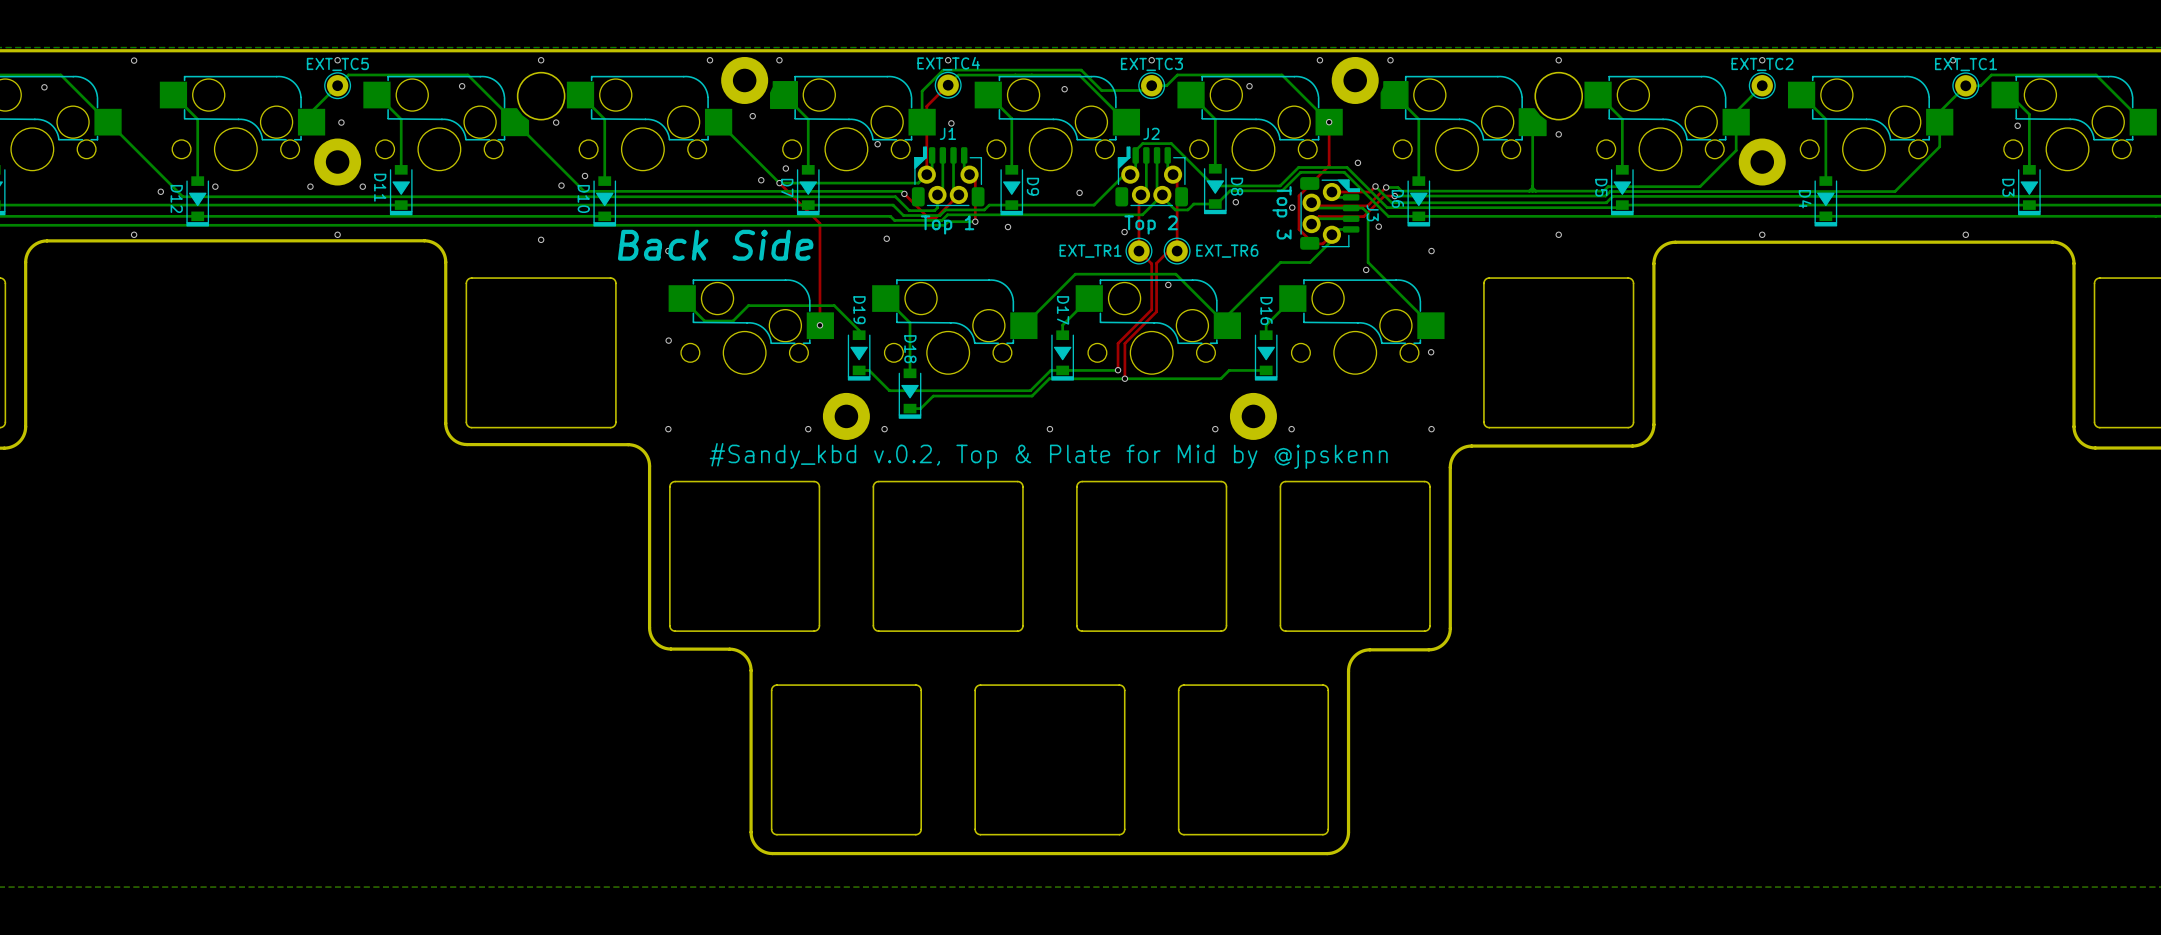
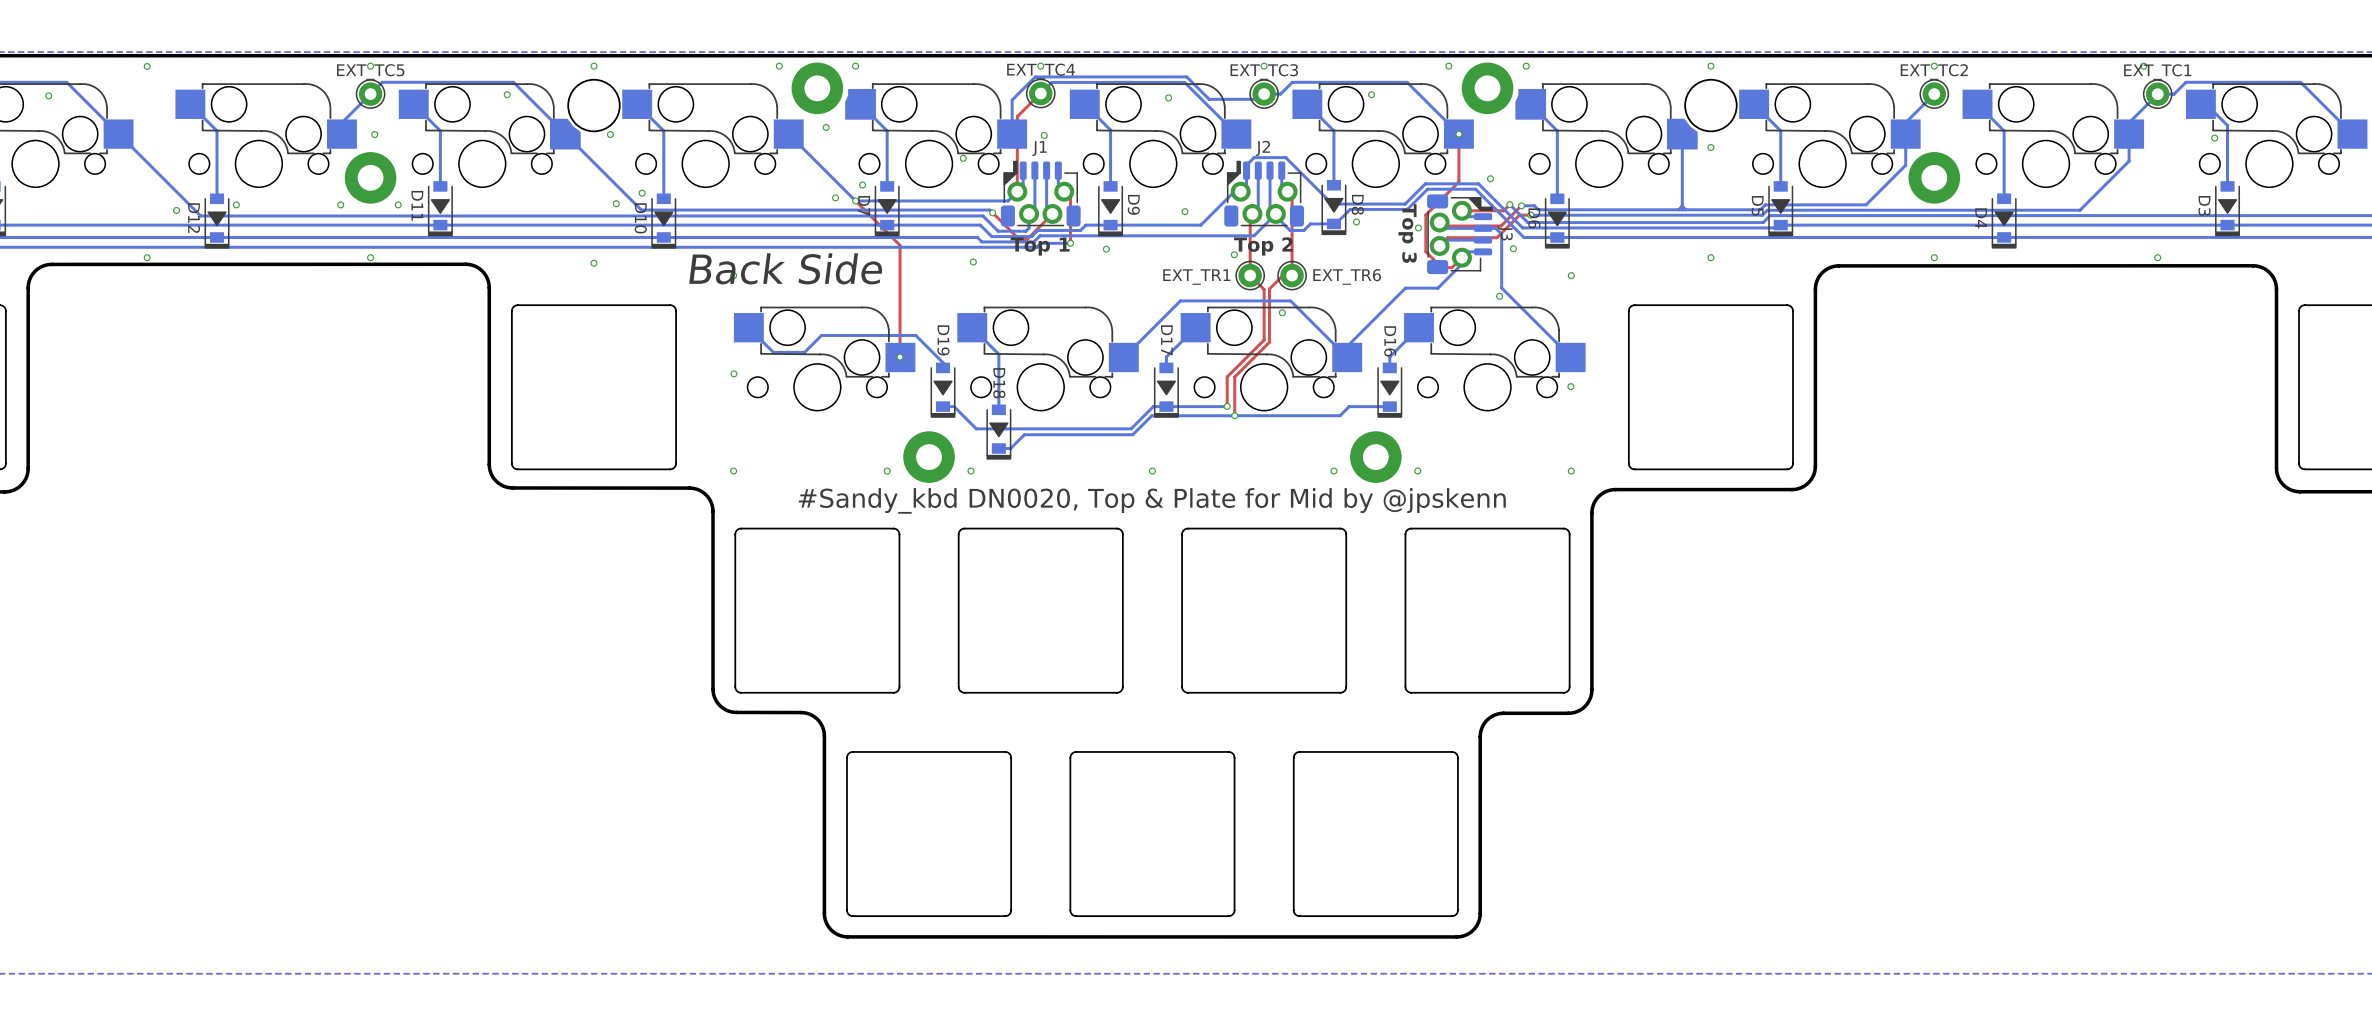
text: #Sandy_kbd v.0.2, Top & Plate for Mid by @jpskenn (1048, 455) -> #Sandy_kbd DN0020, Top & Plate for Mid by @jpskenn (1152, 500)

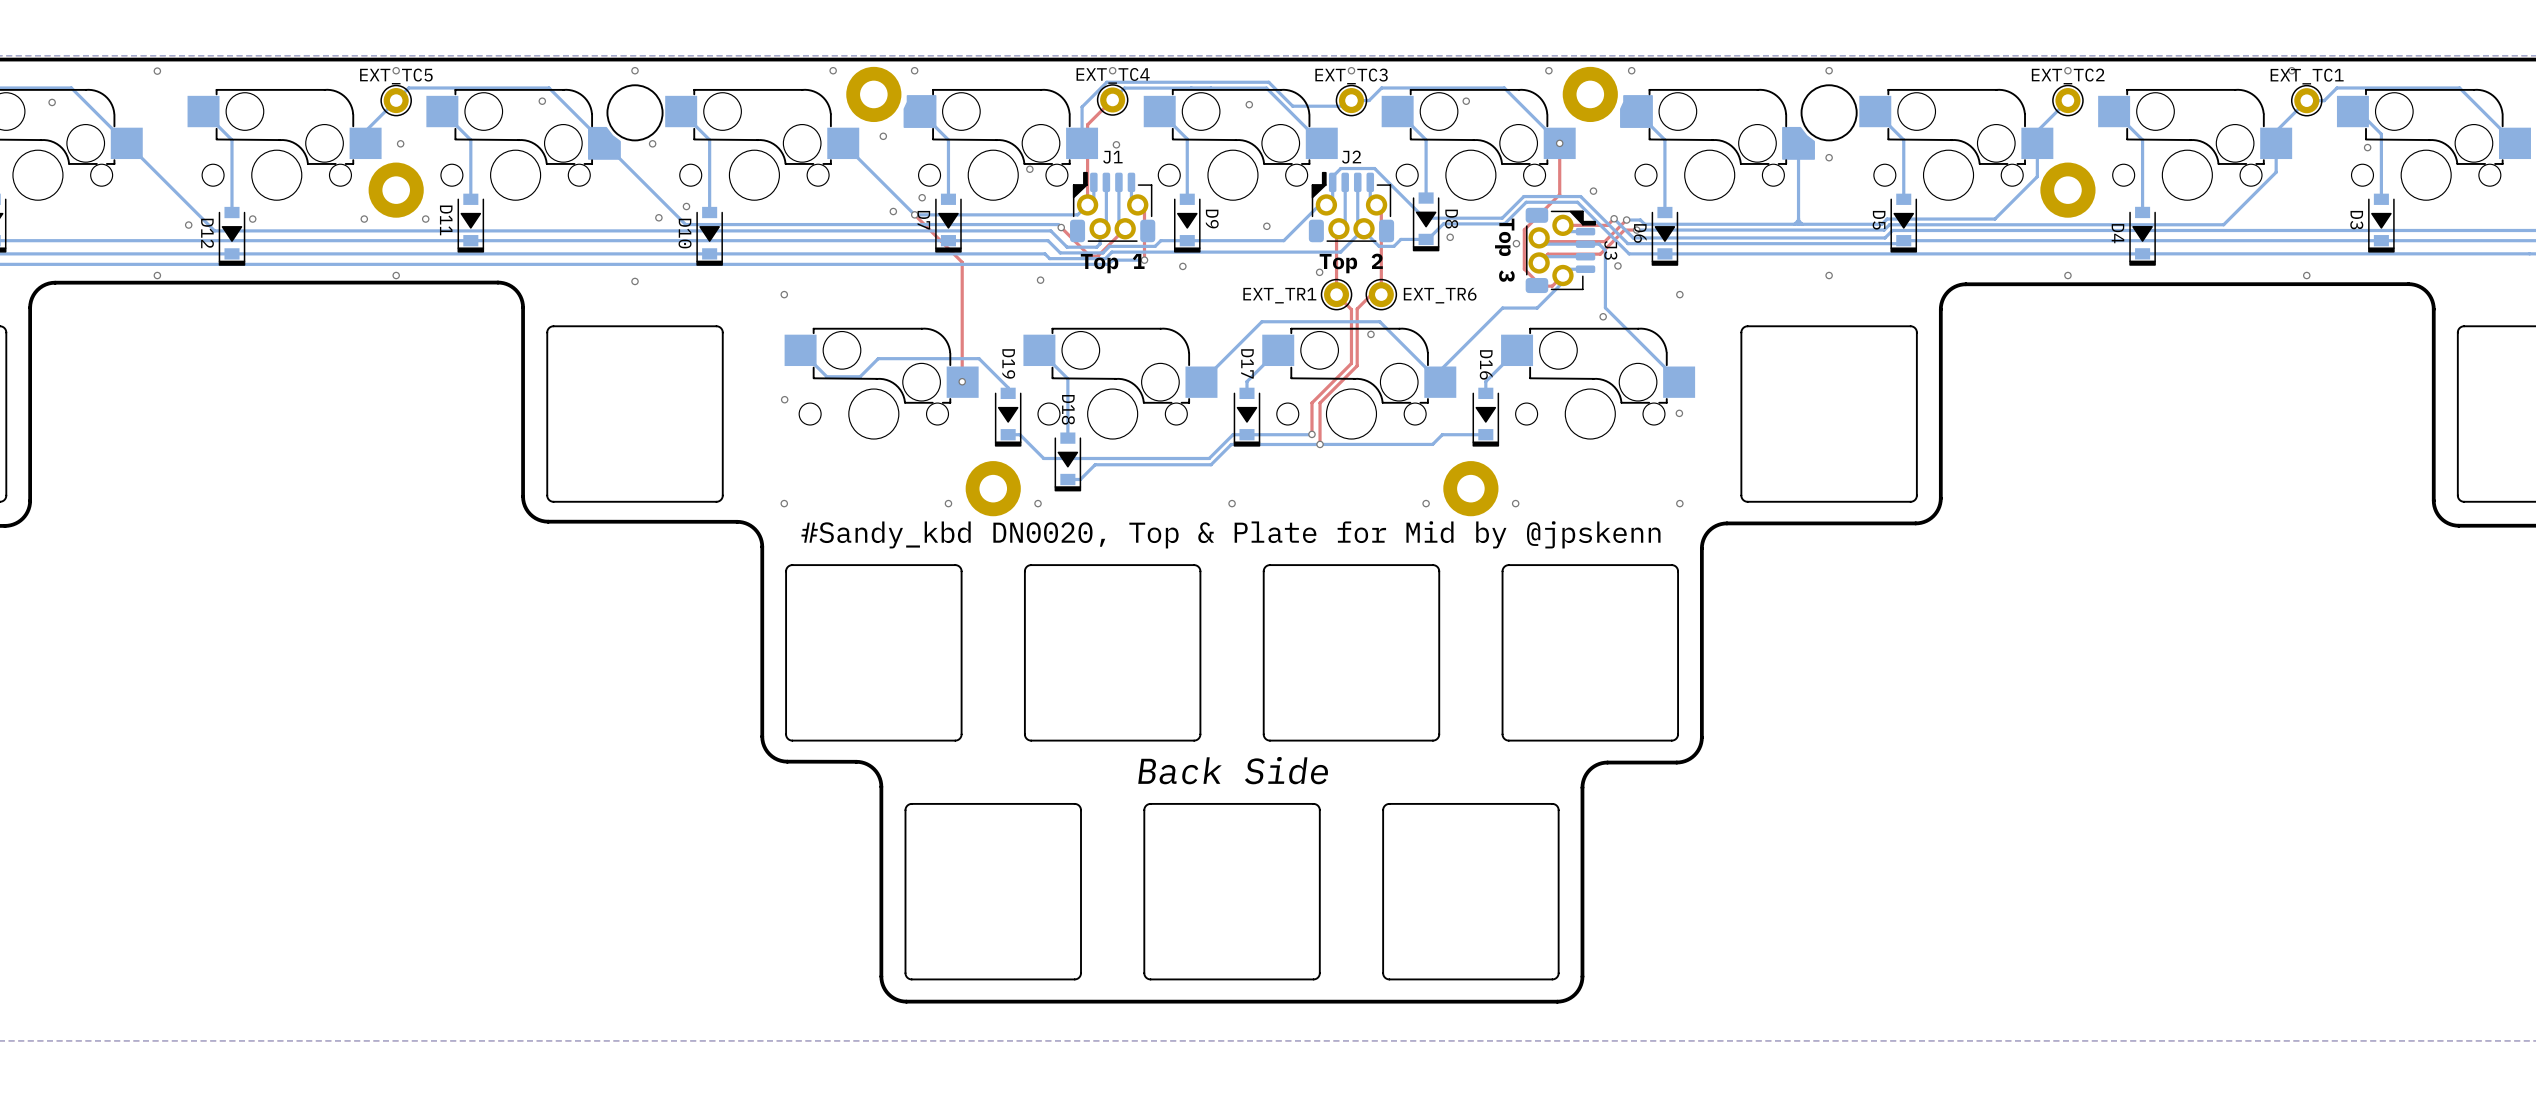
text: Back Side (785, 268) -> none
text: none -> Back Side (1233, 770)

